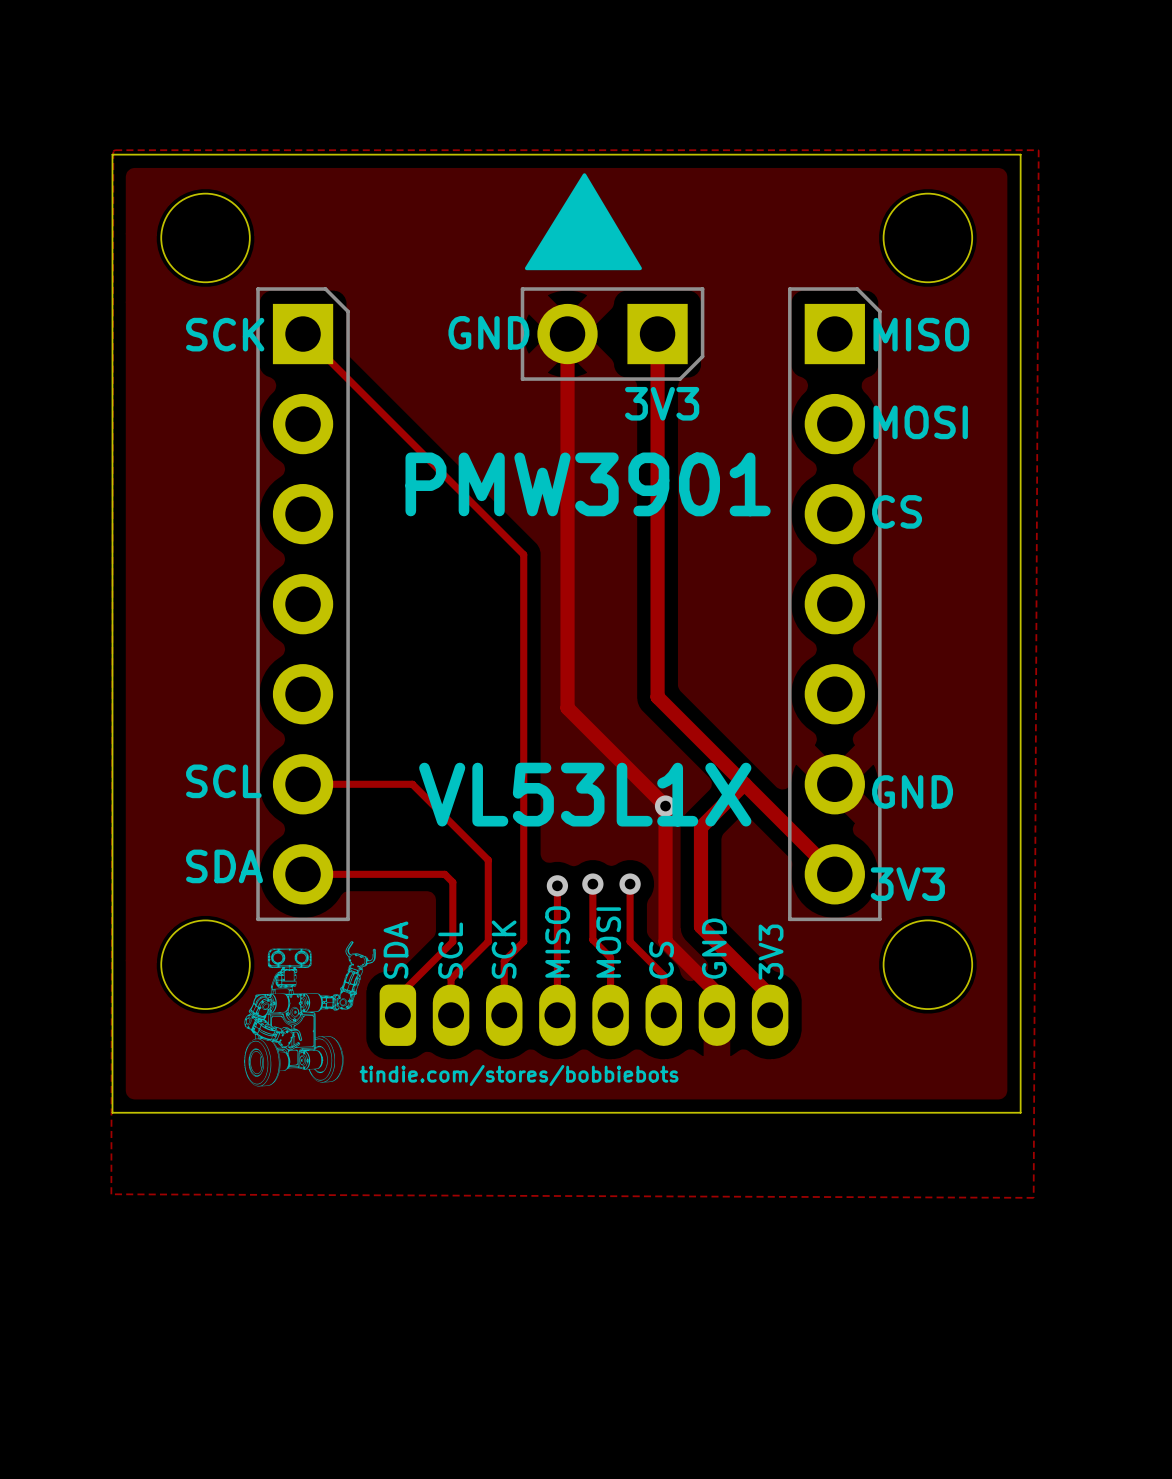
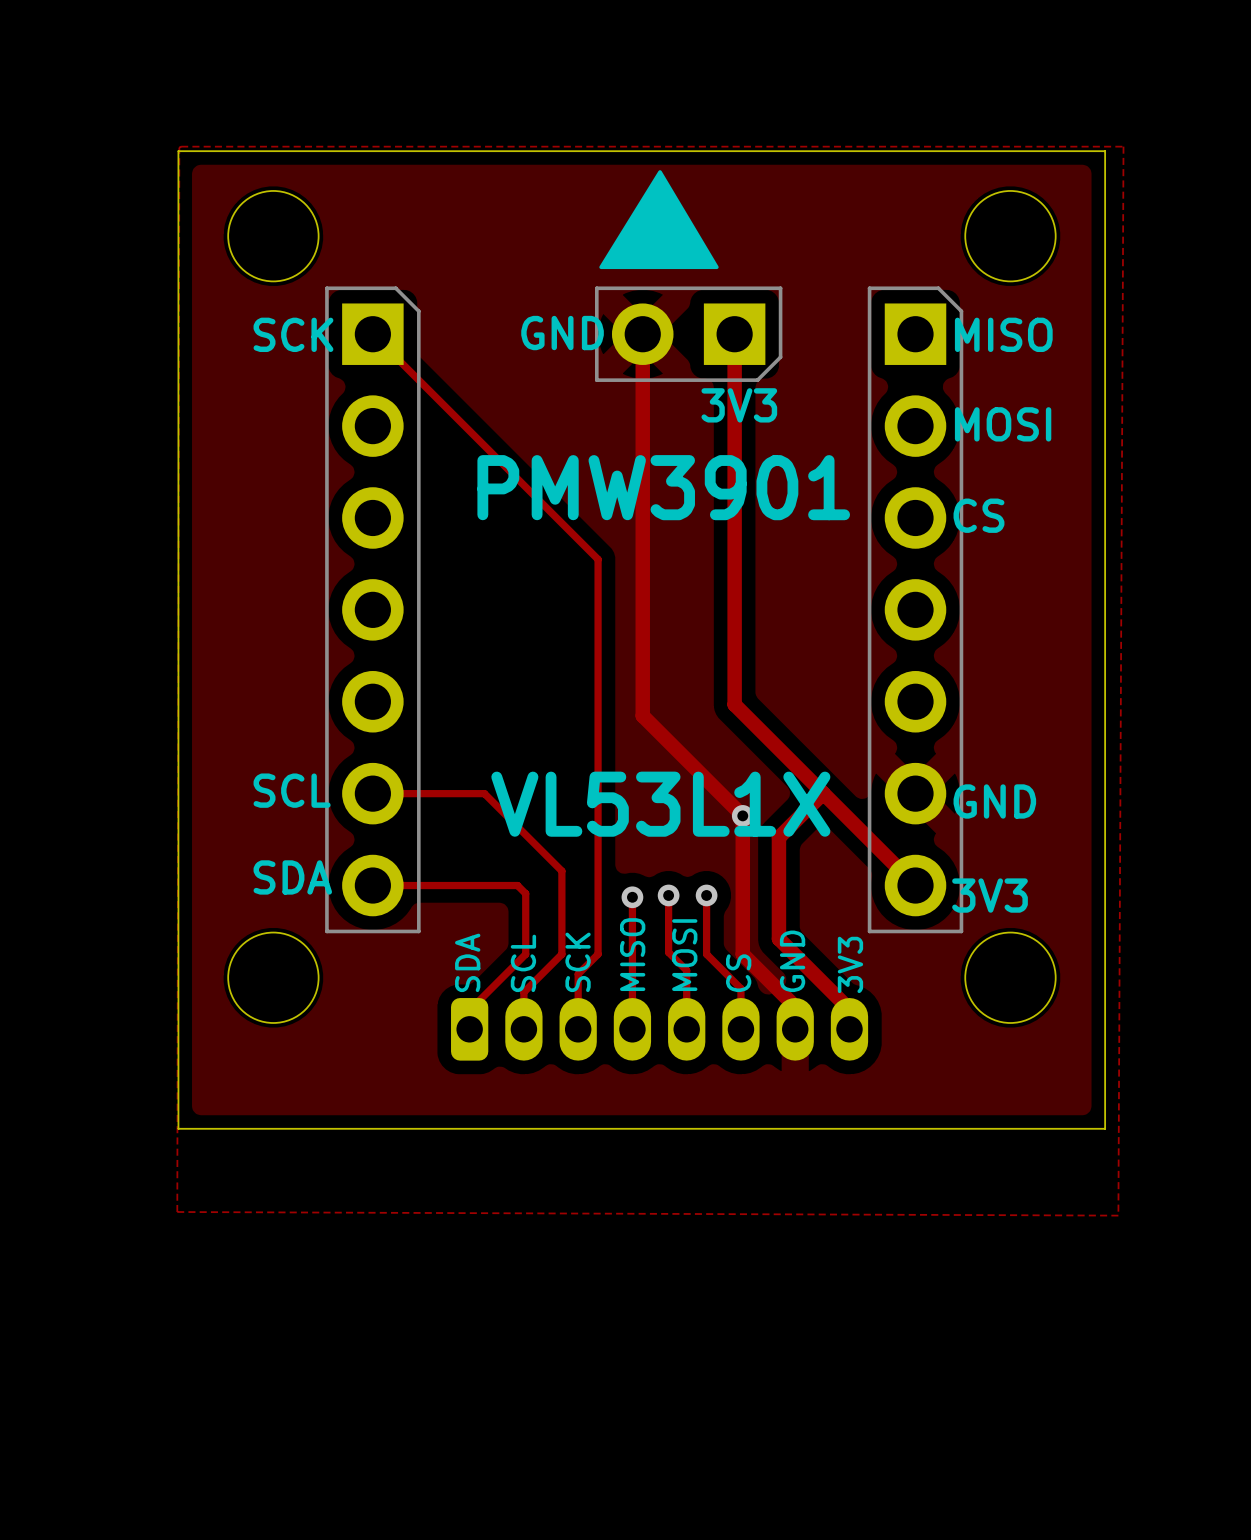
drawing: [244, 941, 376, 1087] -> none
text: tindie.com/stores/bobbiebots (519, 1075) -> none

